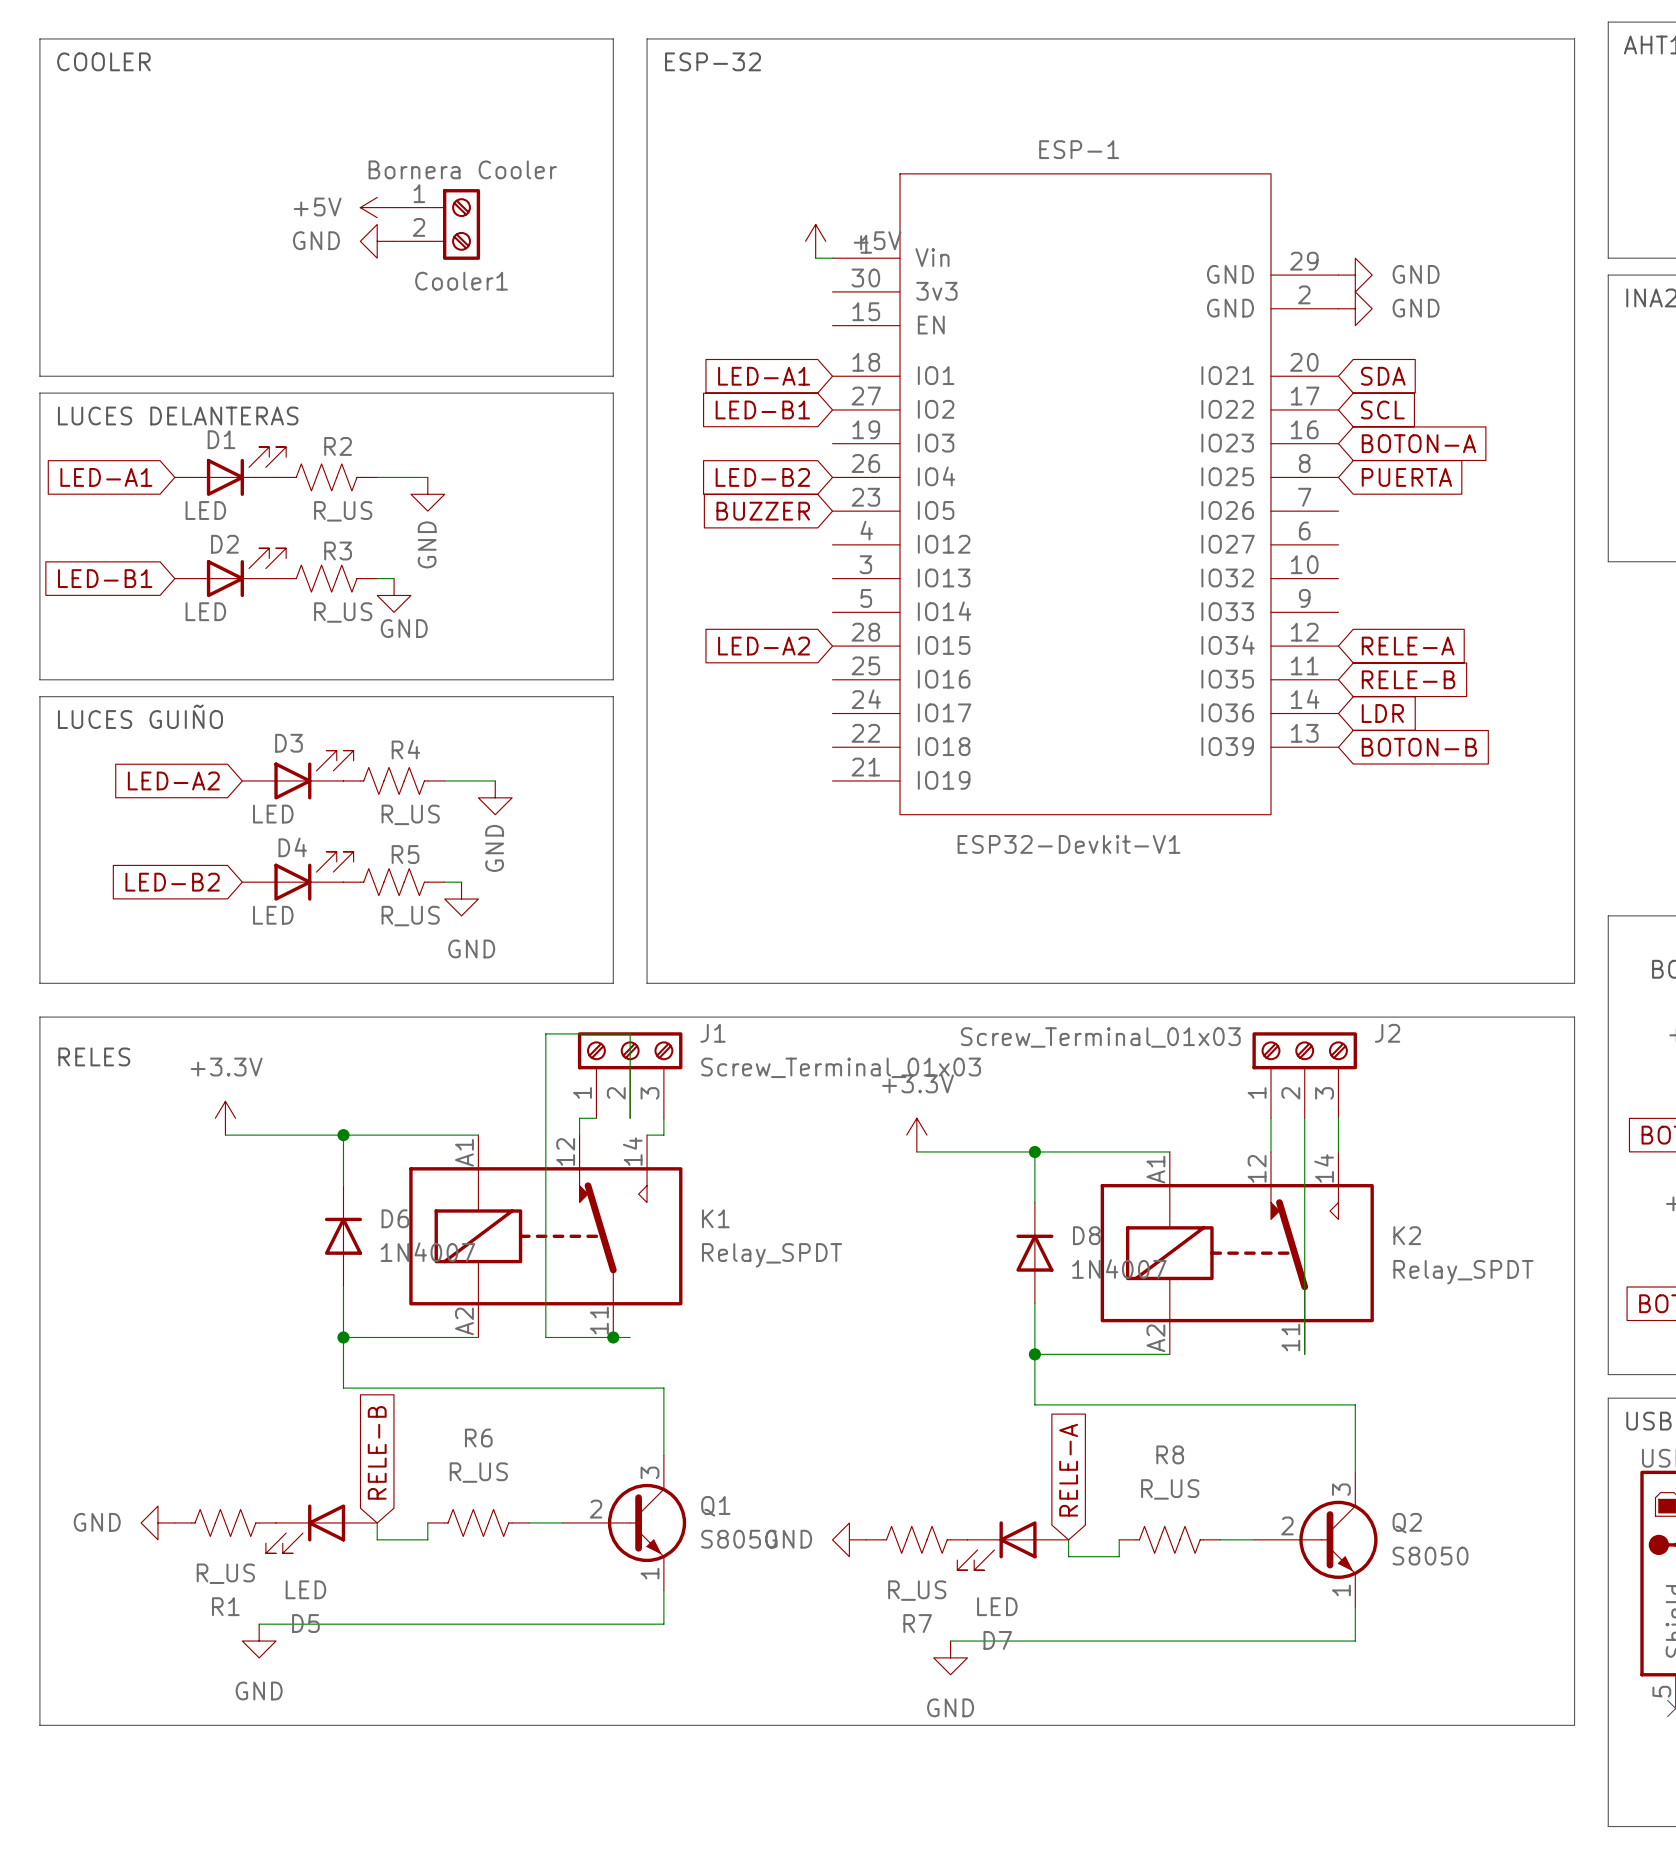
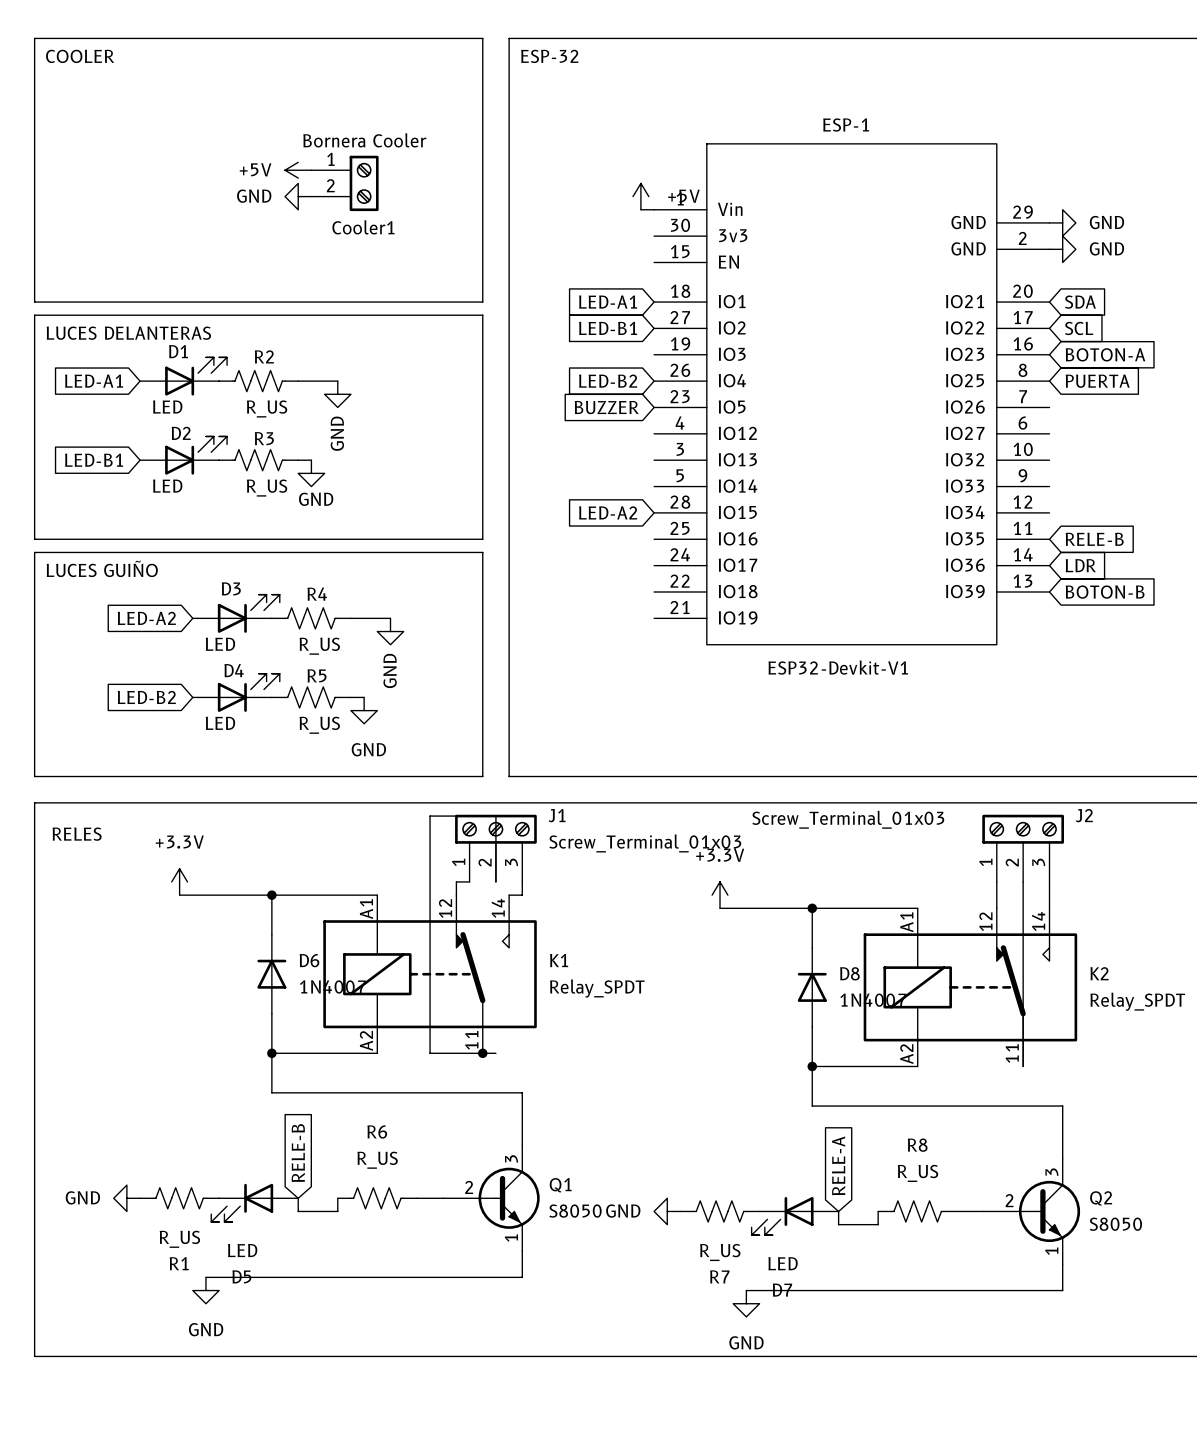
global label: RELE-A (1408, 646) -> none

